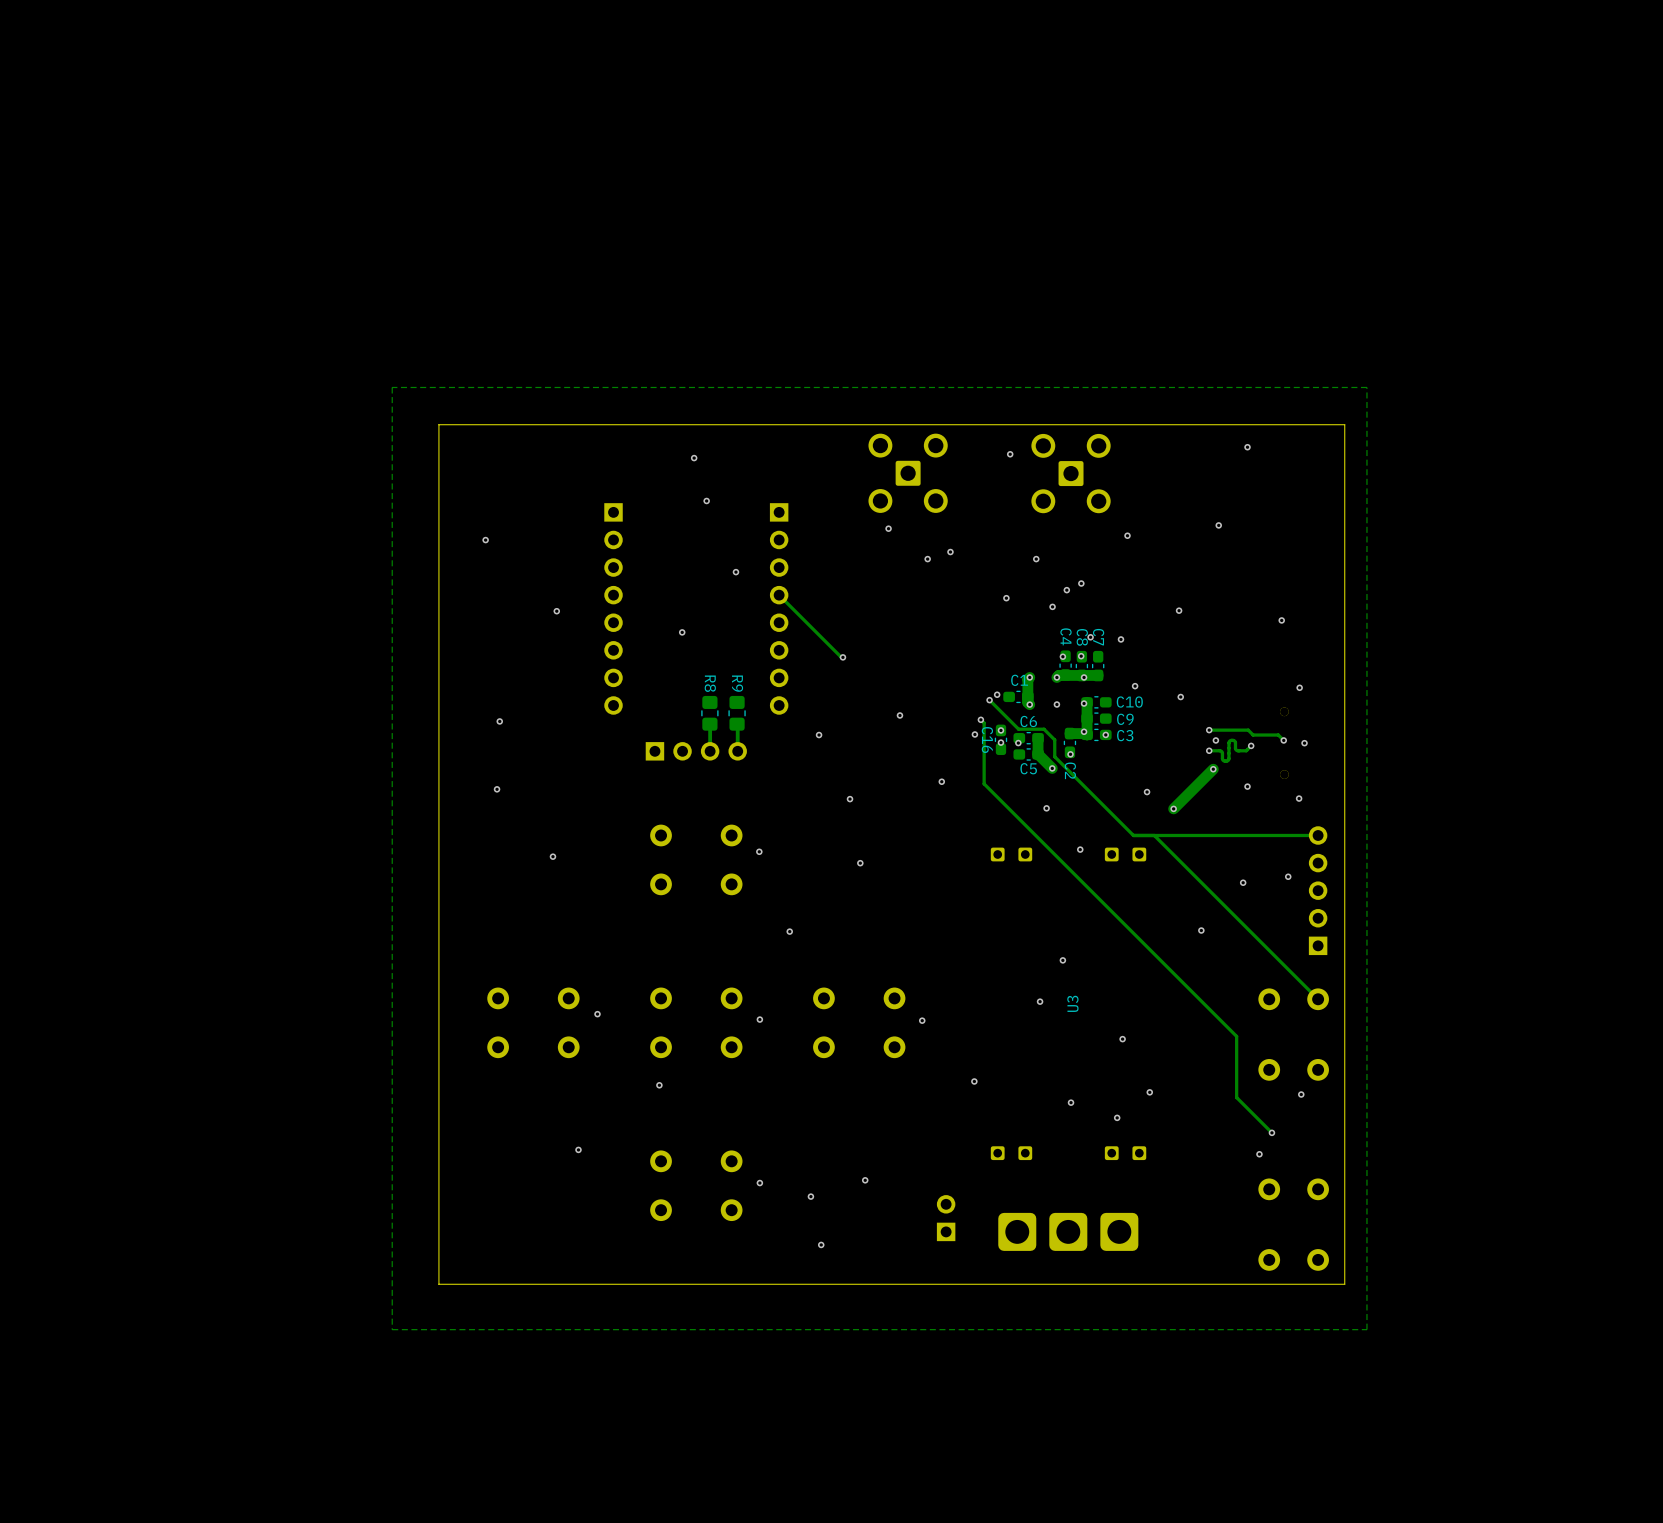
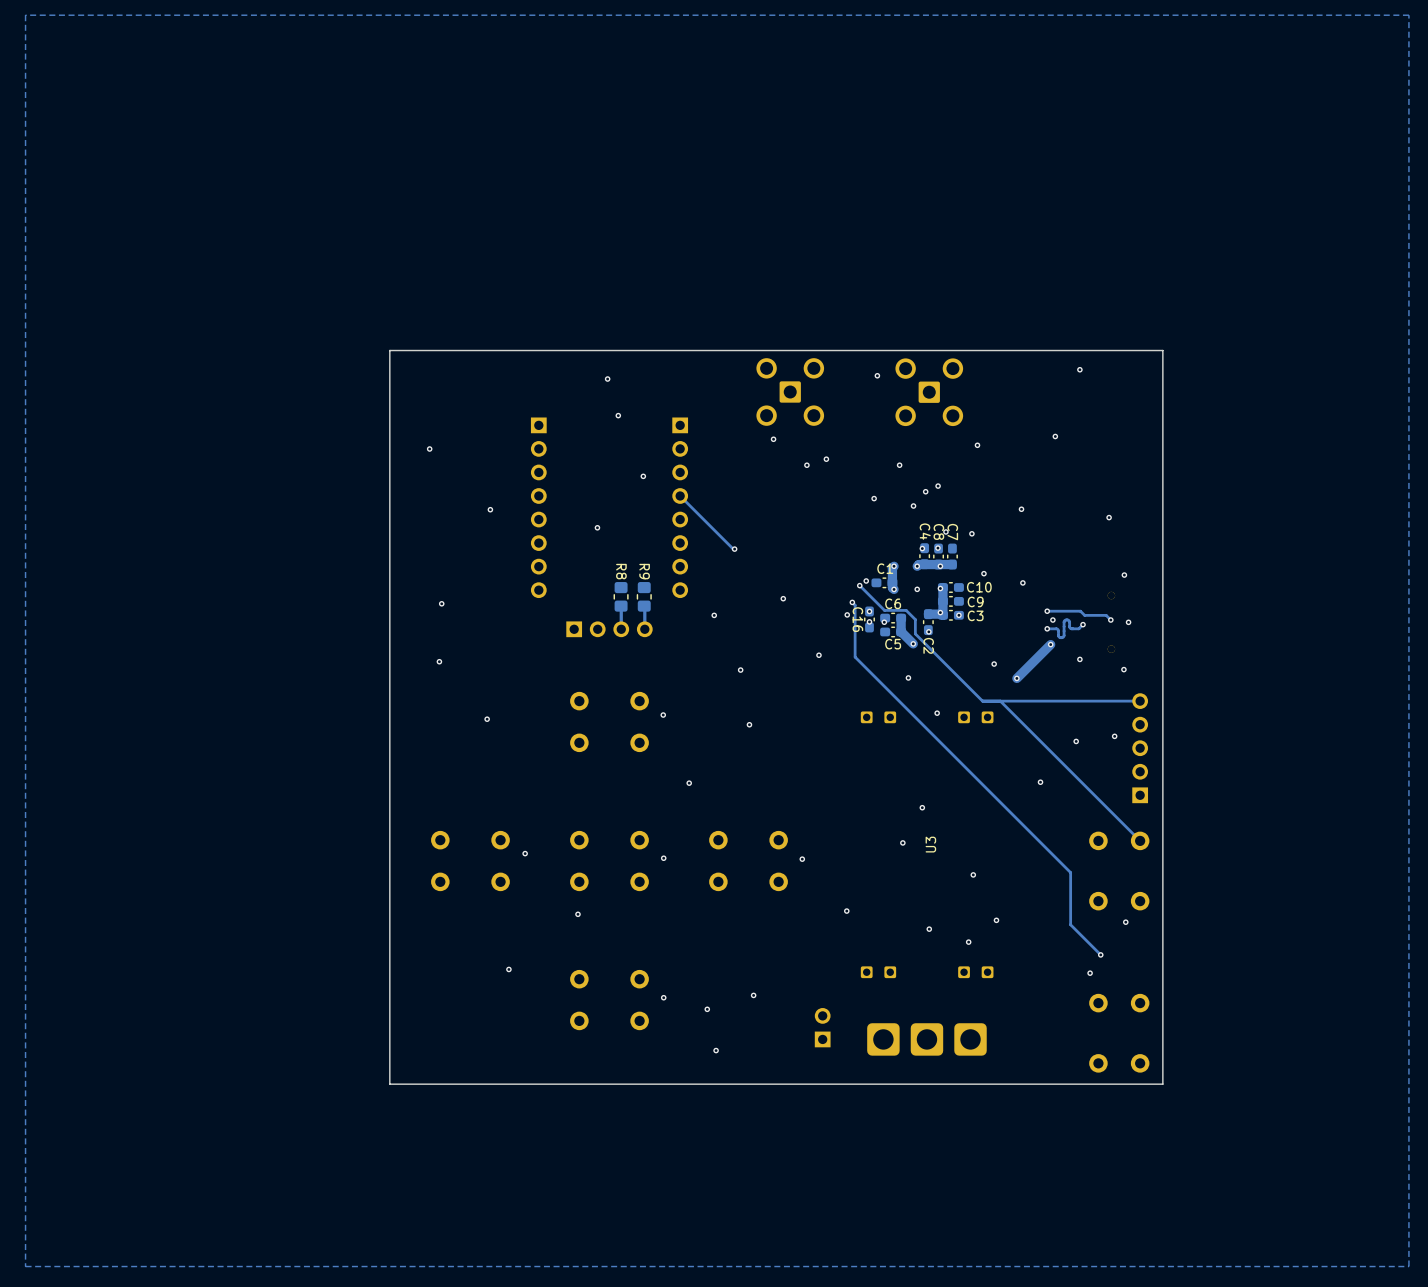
zone outline: none -> (1408, 15) (1408, 1266) (25, 1266) (25, 15) (1408, 15)
zone outline: (1366, 387) (1366, 1329) (392, 1329) (392, 387) (1366, 387) -> none

